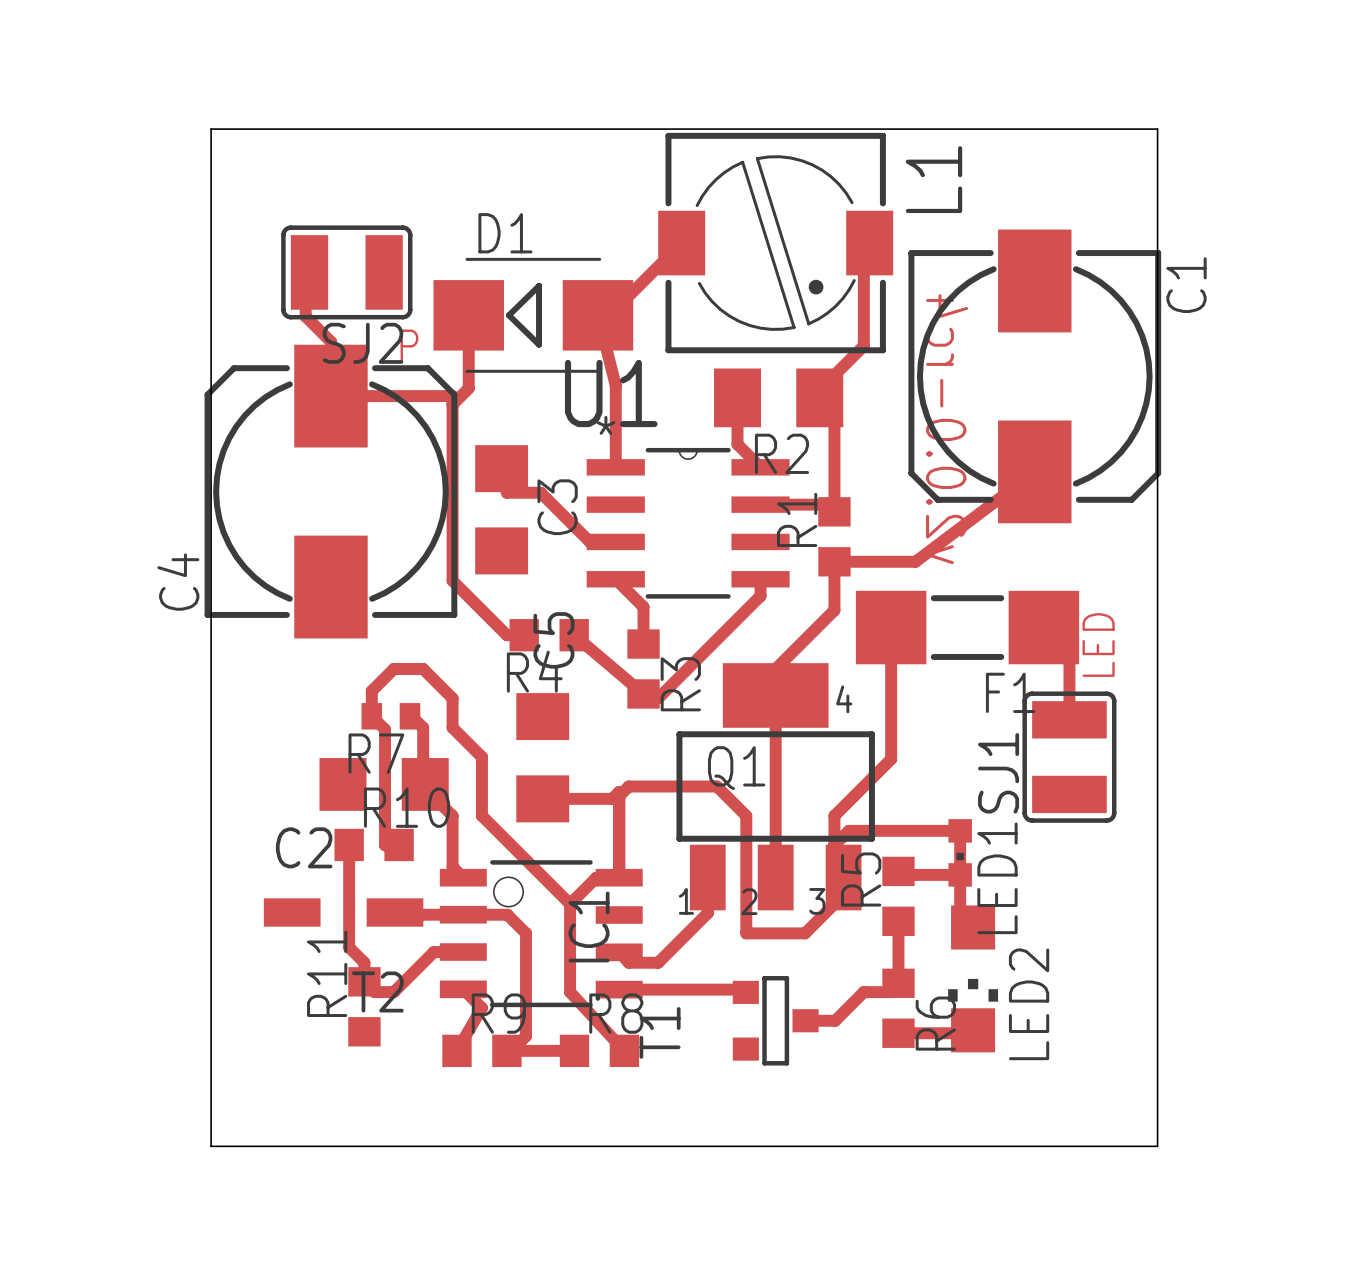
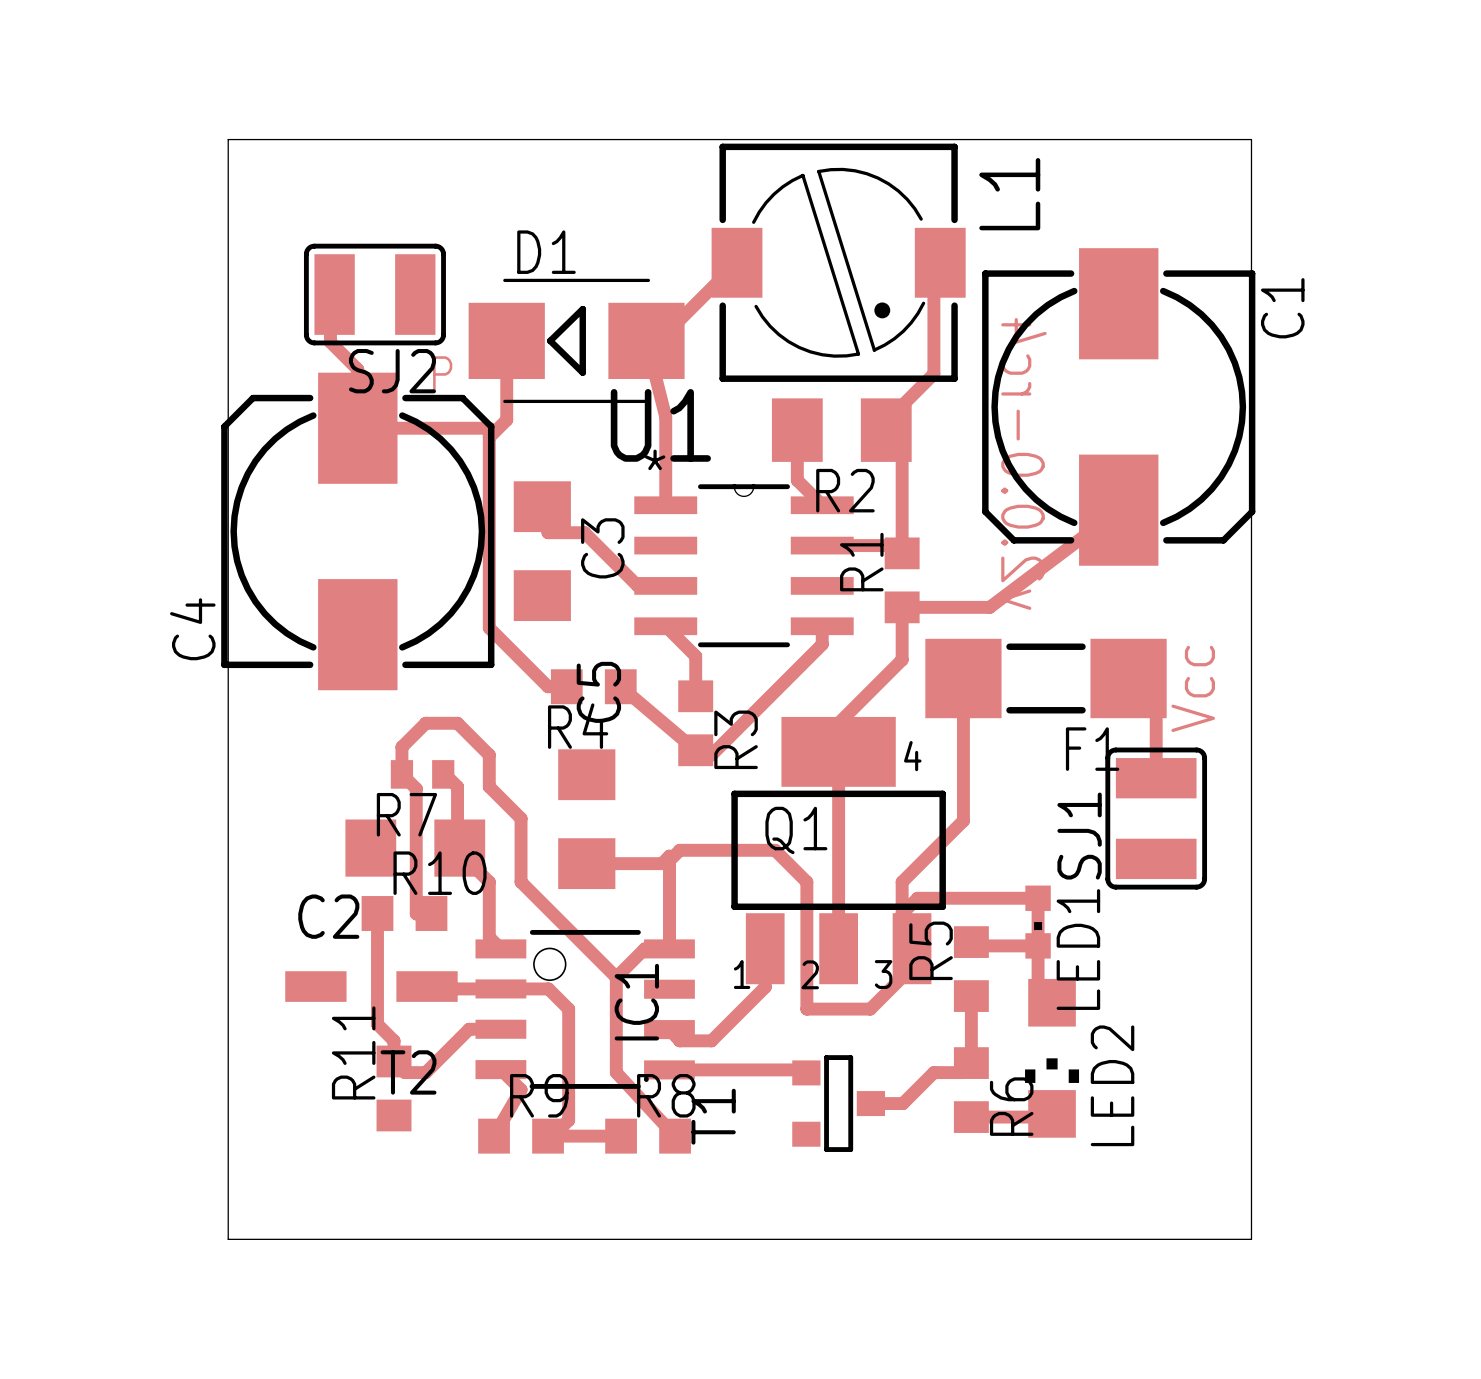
text: LED (1098, 645) -> Vcc (1193, 688)

